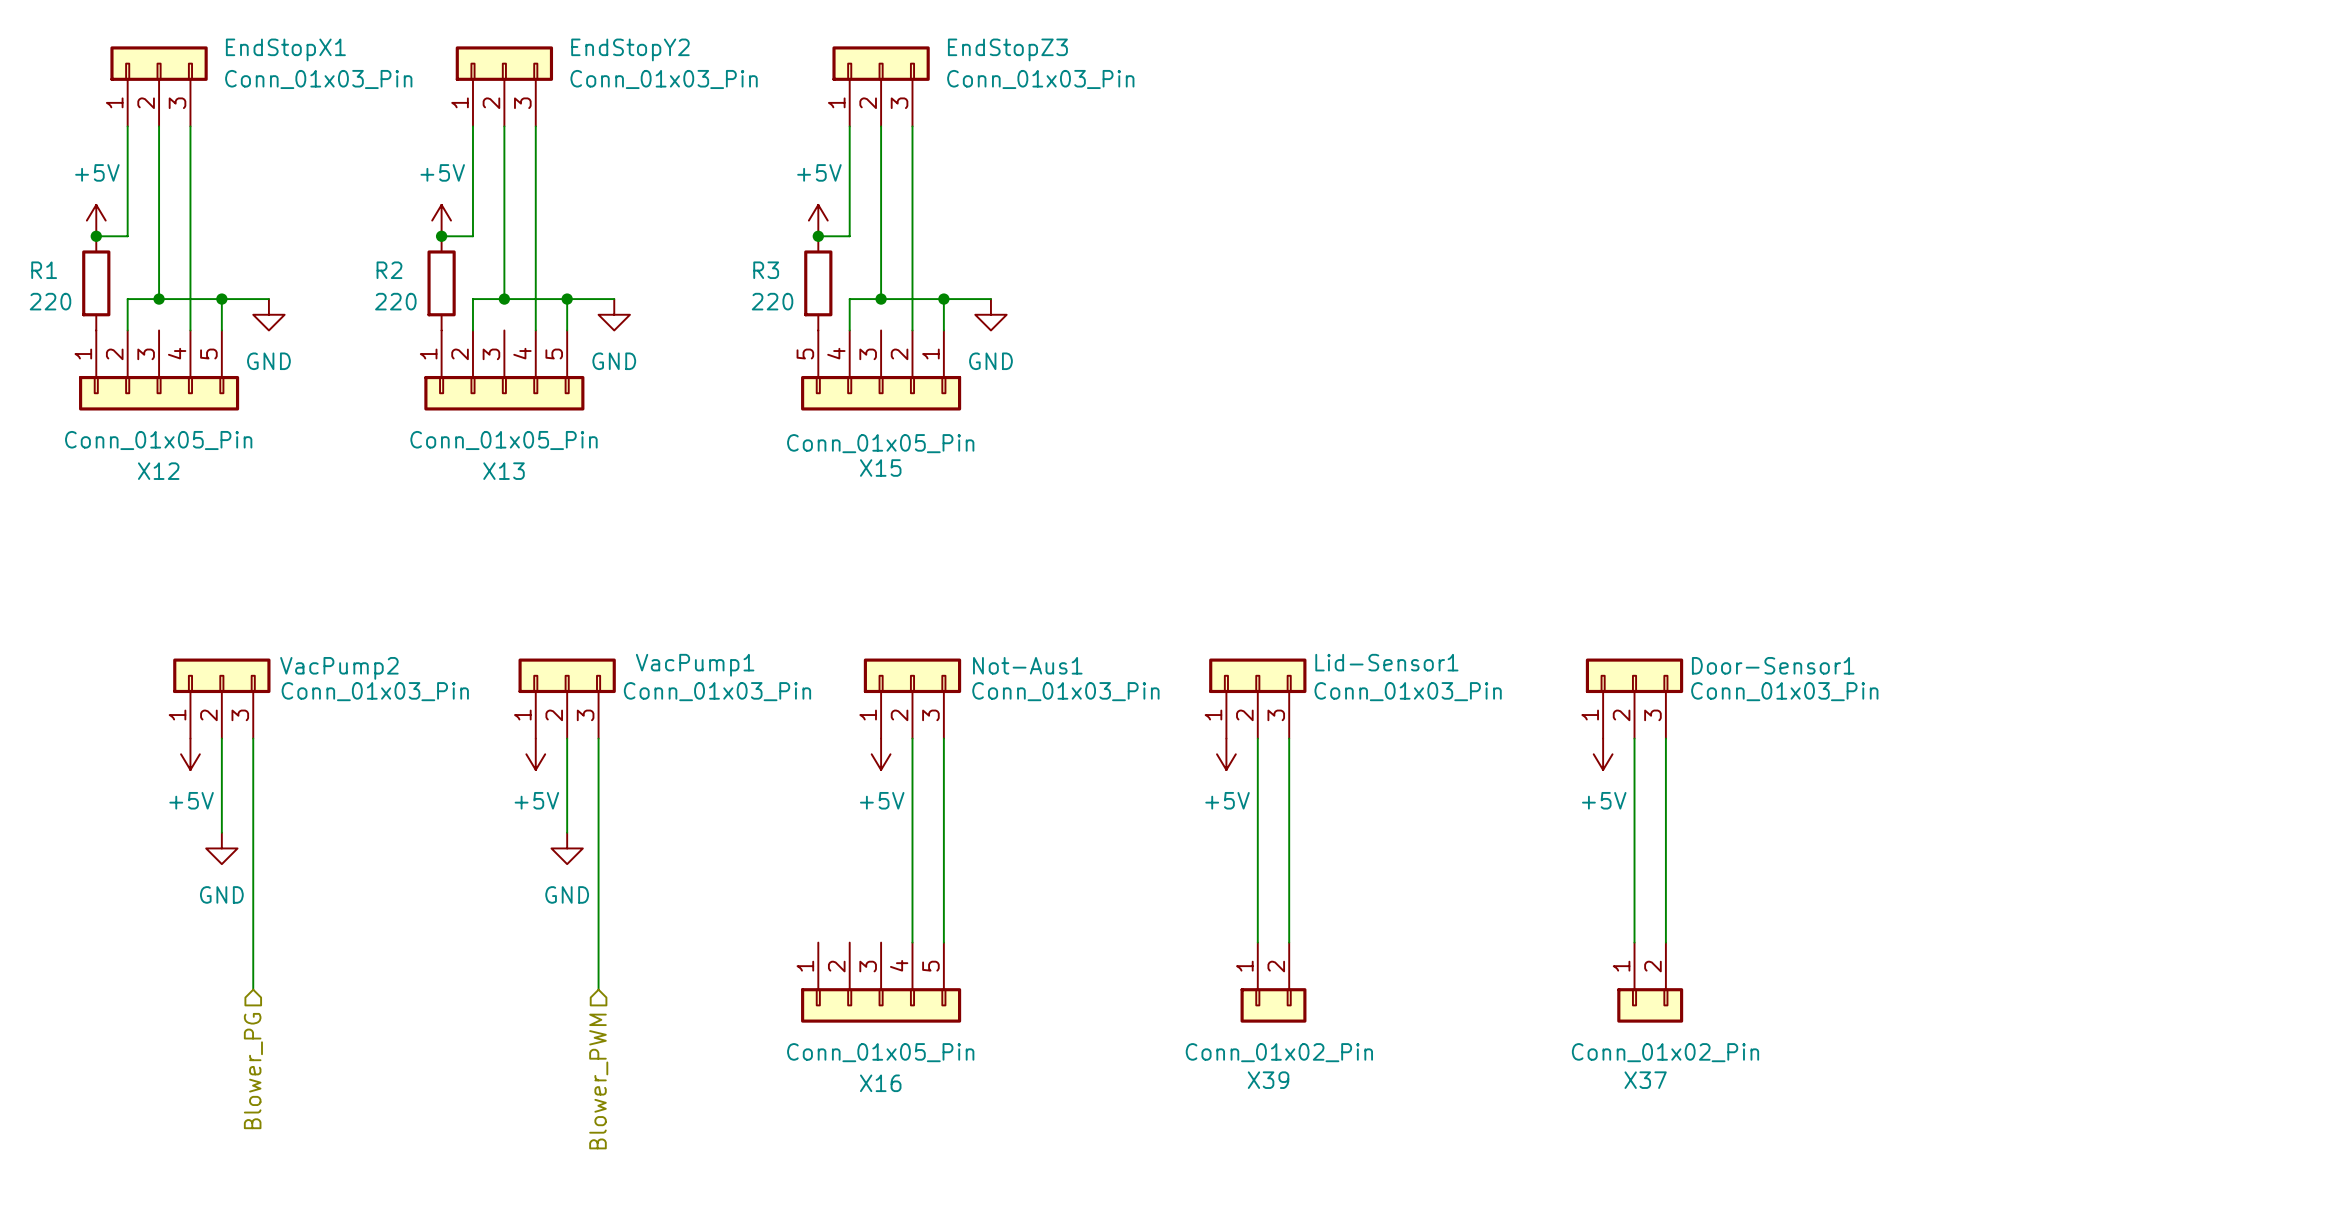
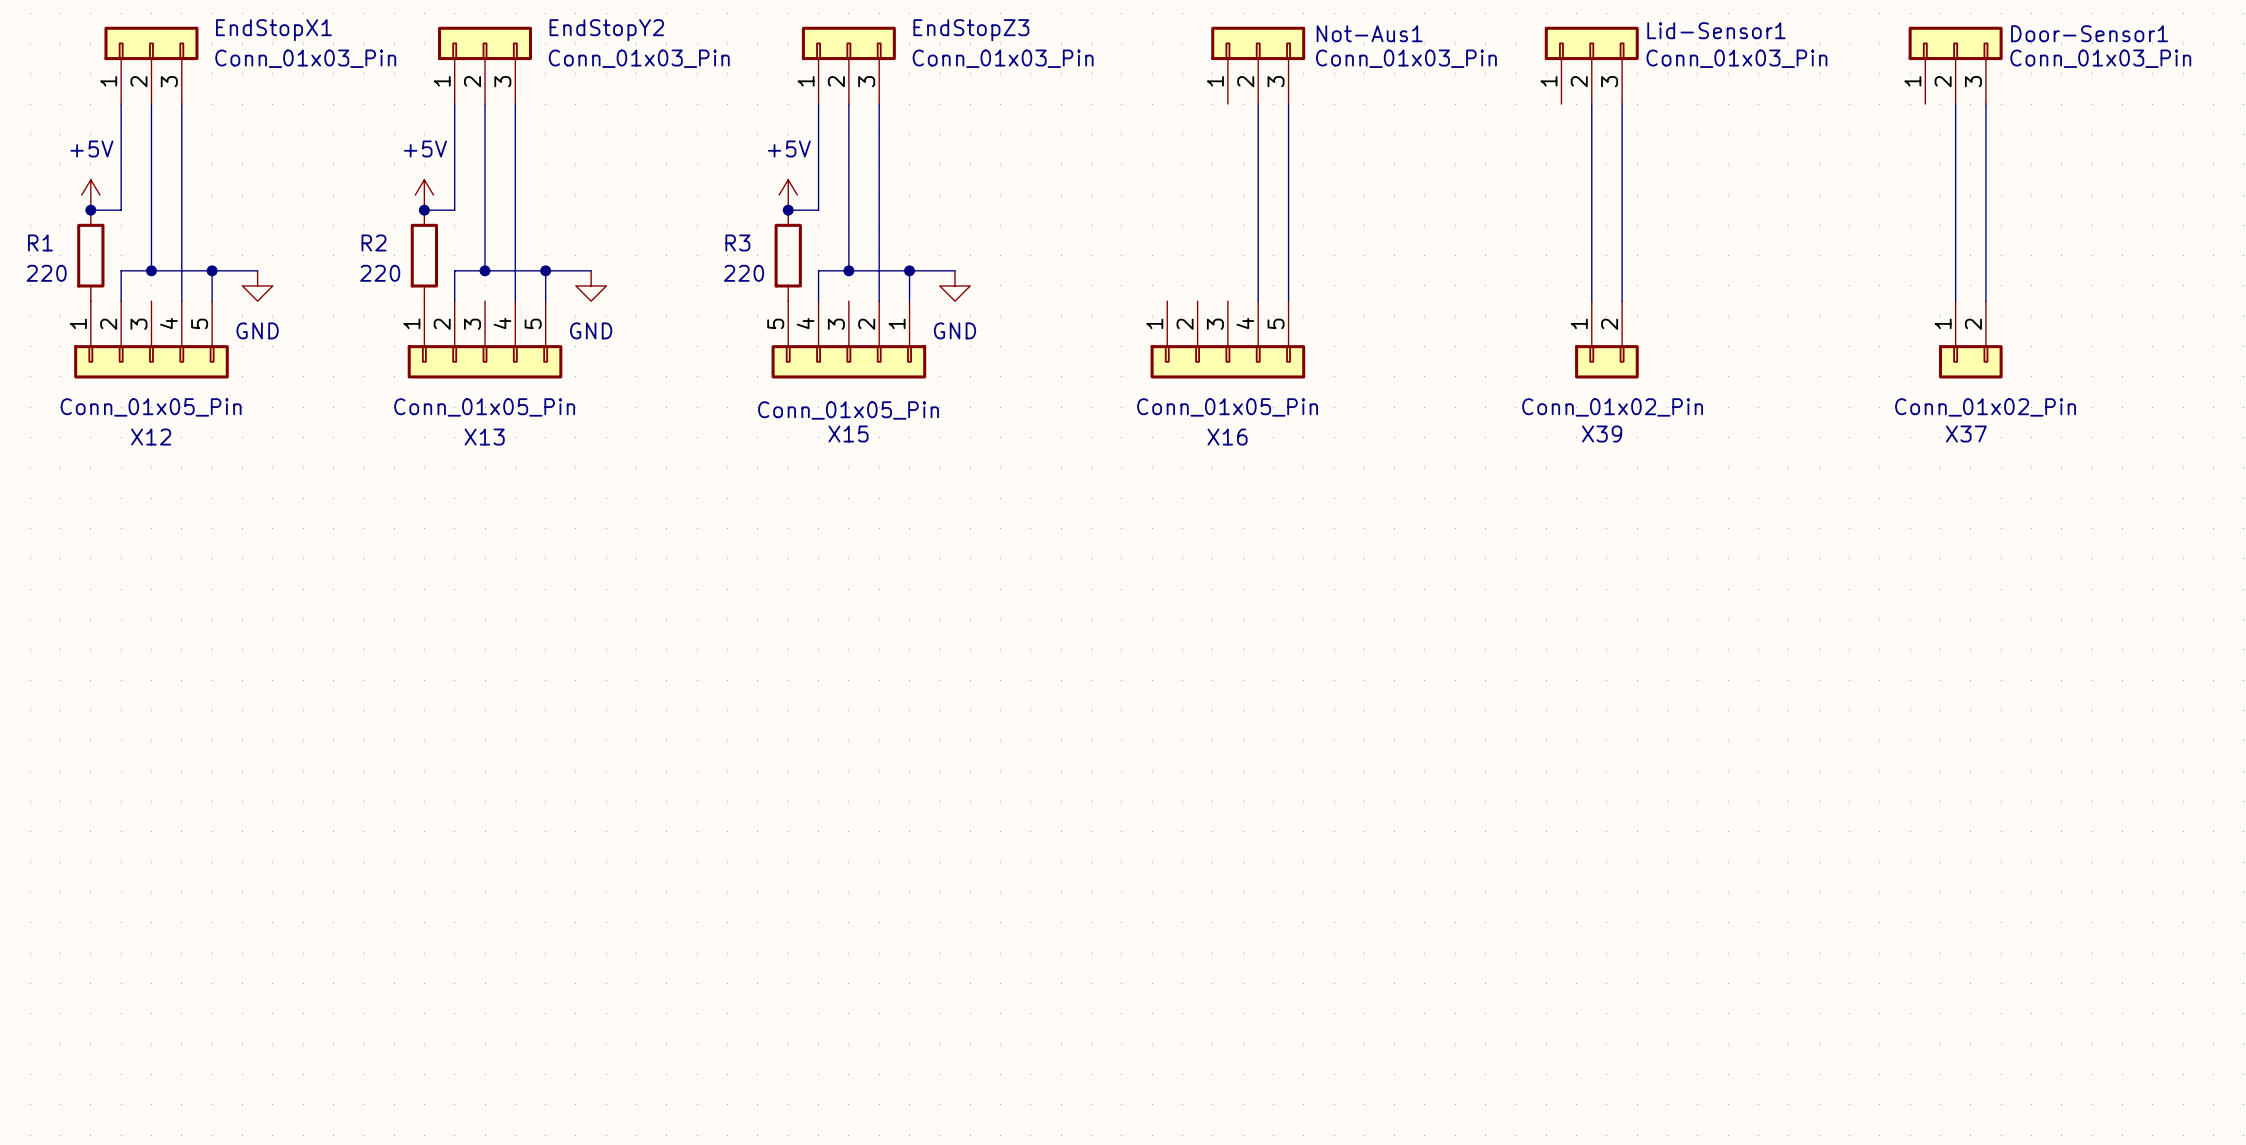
wire: none -> (1258, 104) (1258, 301)
wire: none -> (1288, 104) (1288, 301)
wire: none -> (1591, 104) (1591, 301)
wire: none -> (1622, 104) (1622, 301)
wire: none -> (1955, 104) (1955, 301)
wire: none -> (1985, 104) (1985, 301)
VacPump2: Conn_01x03_Pin (221, 698) -> none
VacPump1: Conn_01x03_Pin (567, 698) -> none
Not-Aus1 position: (912, 698) -> (1258, 65)
Lid-Sensor1 position: (1257, 698) -> (1591, 65)
Door-Sensor1 position: (1634, 698) -> (1955, 65)
wire: (221, 738) (221, 832) -> none
wire: (253, 738) (253, 989) -> none
wire: (567, 738) (567, 832) -> none
wire: (598, 738) (598, 989) -> none
wire: (912, 738) (912, 942) -> none
wire: (943, 738) (943, 942) -> none
wire: (1257, 738) (1257, 942) -> none
wire: (1289, 738) (1289, 942) -> none
wire: (1634, 738) (1634, 942) -> none
wire: (1665, 738) (1665, 942) -> none
power symbol: +5V (190, 754) -> none
power symbol: +5V (535, 754) -> none
power symbol: +5V (881, 754) -> none
power symbol: +5V (1226, 754) -> none
power symbol: +5V (1603, 754) -> none
power symbol: GND (221, 848) -> none
power symbol: GND (567, 848) -> none
X16 position: (881, 982) -> (1227, 339)
X39 position: (1273, 982) -> (1606, 339)
X37 position: (1650, 982) -> (1970, 339)
hierarchical label: Blower_PG (253, 1071) -> none
hierarchical label: Blower_PWM (598, 1081) -> none

